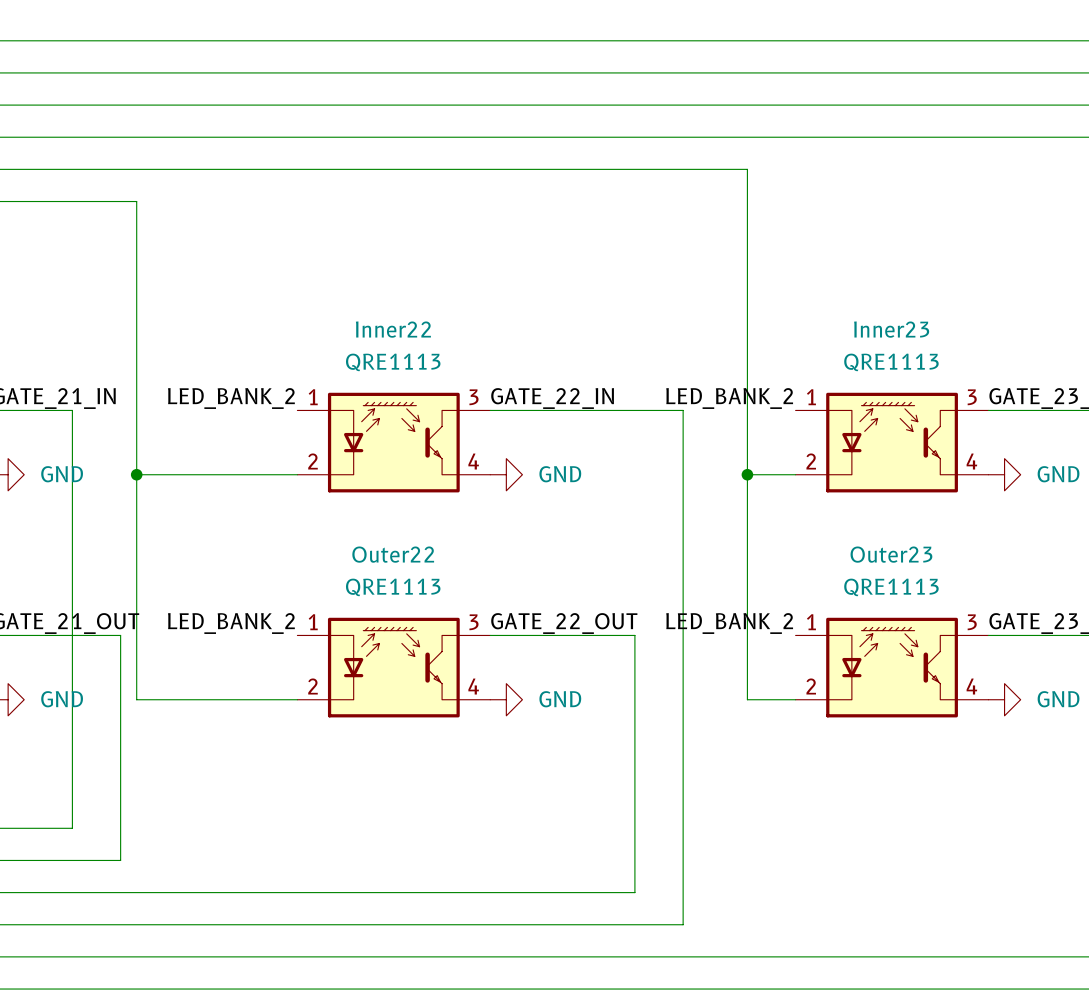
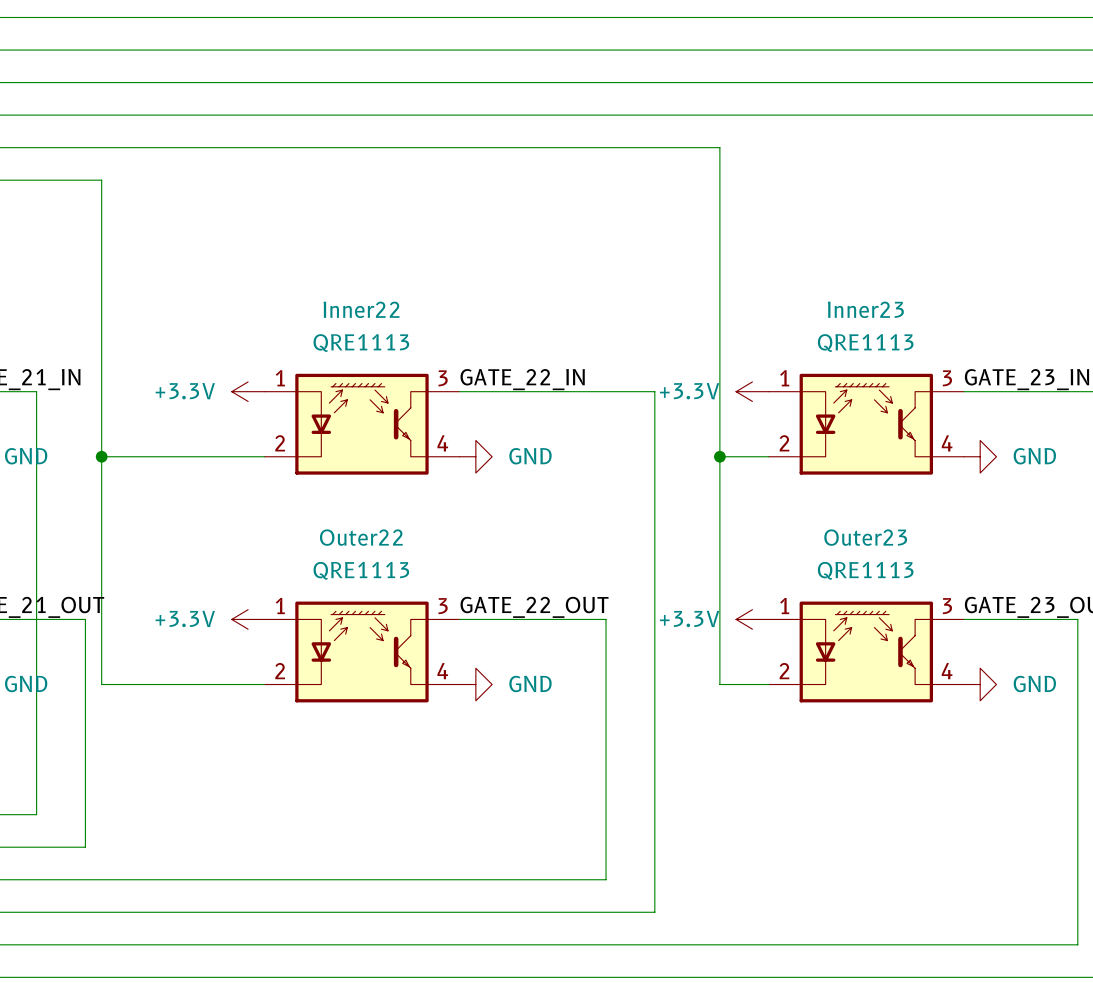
label: LED_BANK_2 (231, 398) -> none
label: LED_BANK_2 (729, 398) -> none
power symbol: none -> +3.3V (248, 391)
power symbol: none -> +3.3V (752, 391)
label: LED_BANK_2 (231, 623) -> none
label: LED_BANK_2 (729, 623) -> none
power symbol: none -> +3.3V (248, 619)
power symbol: none -> +3.3V (752, 619)

